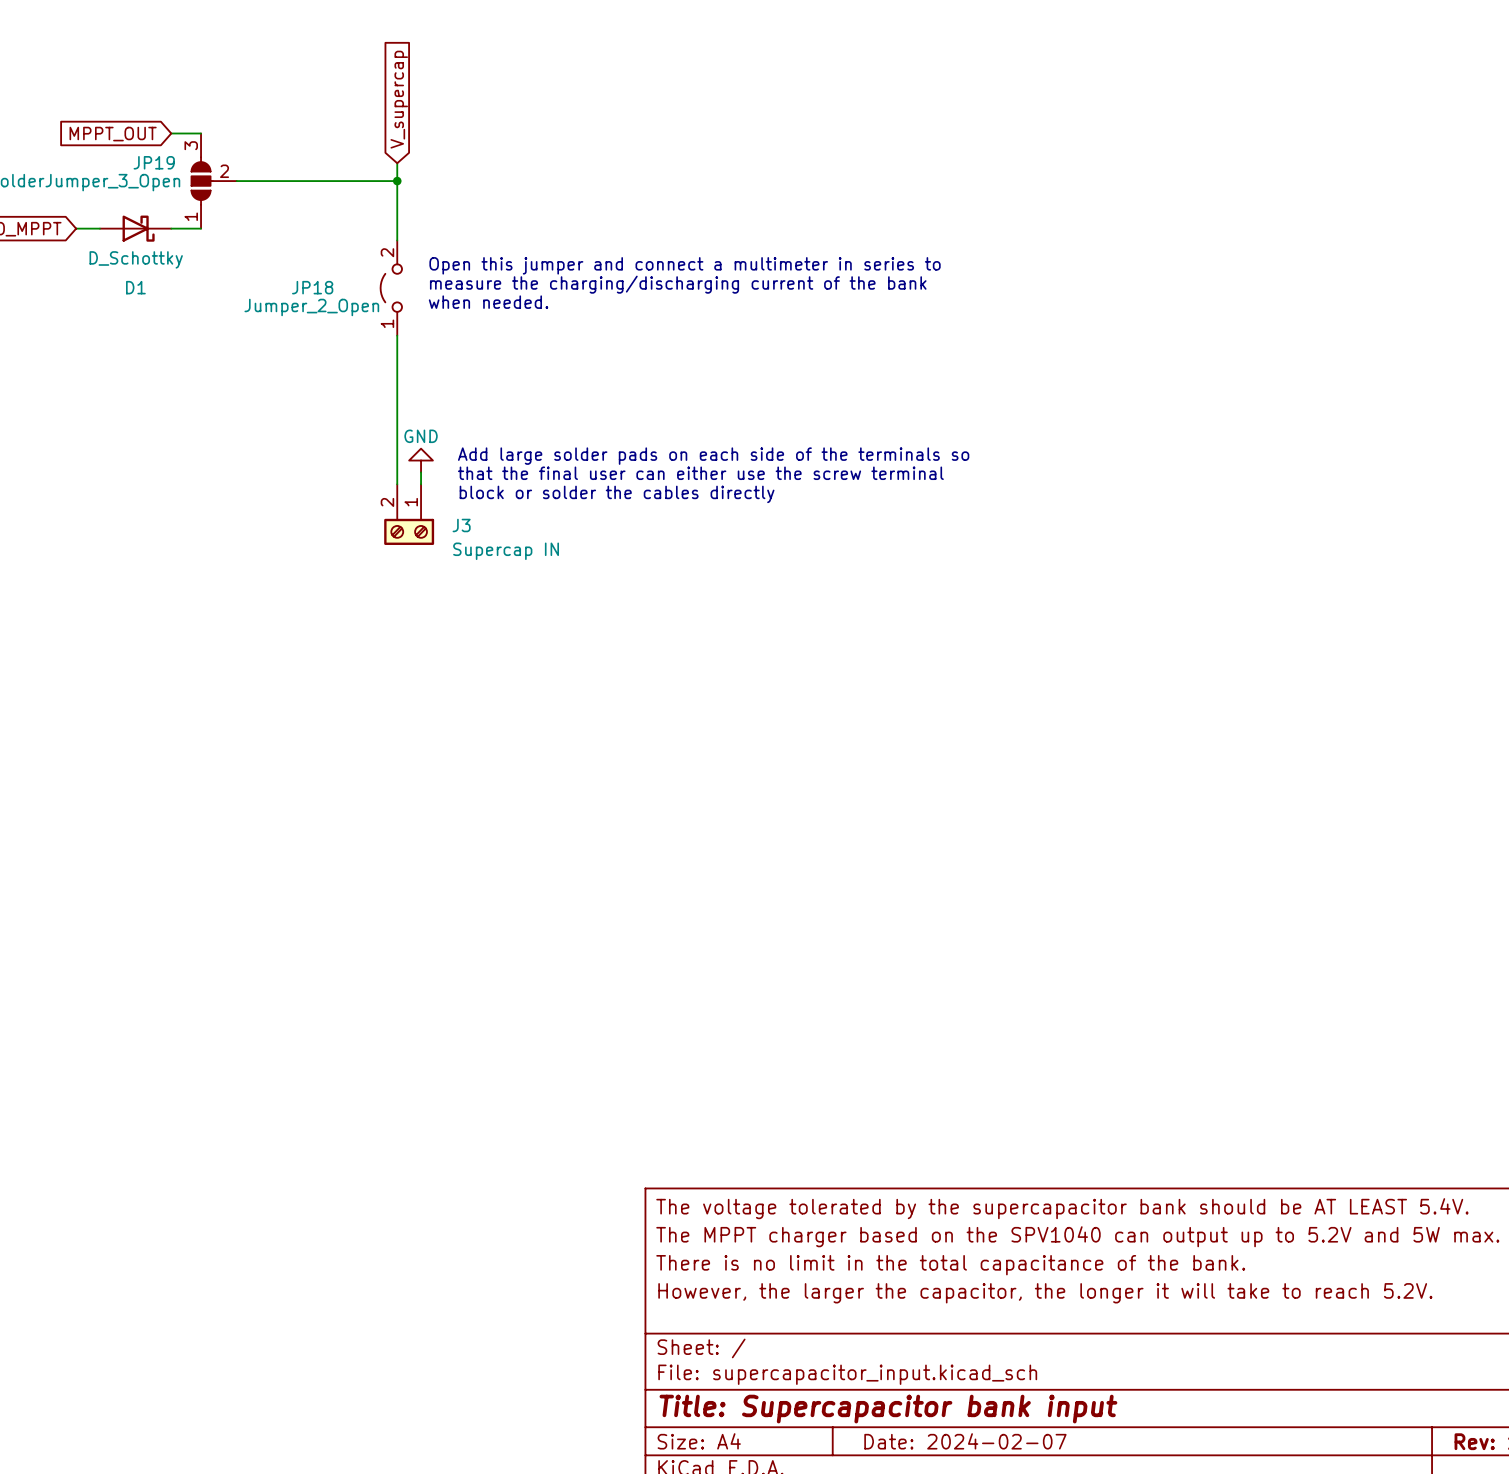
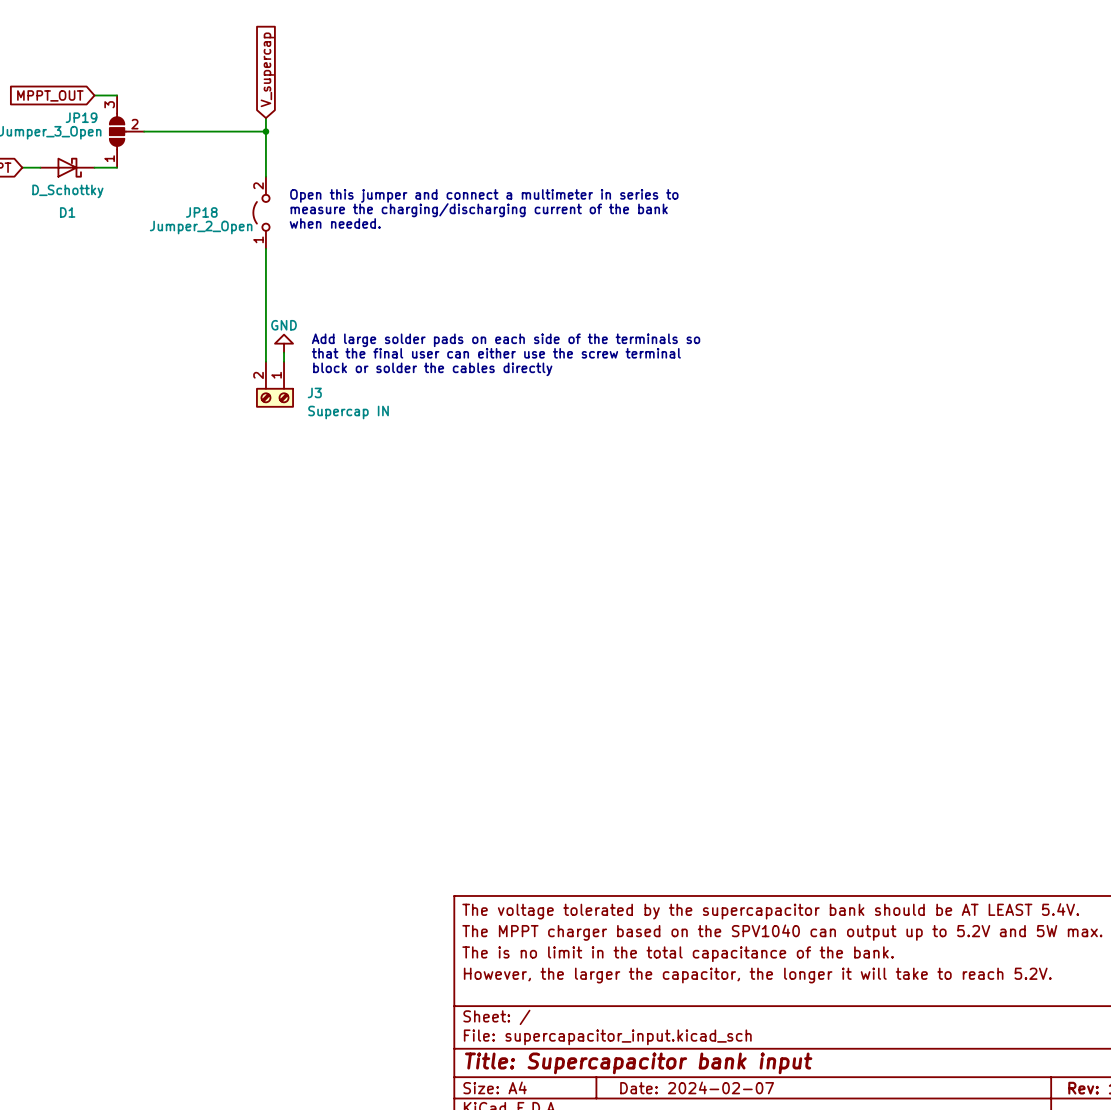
title block: There is no limit in the total capacitance of the bank. (950, 1265) -> The is no limit in the total capacitance of the bank. (678, 954)

